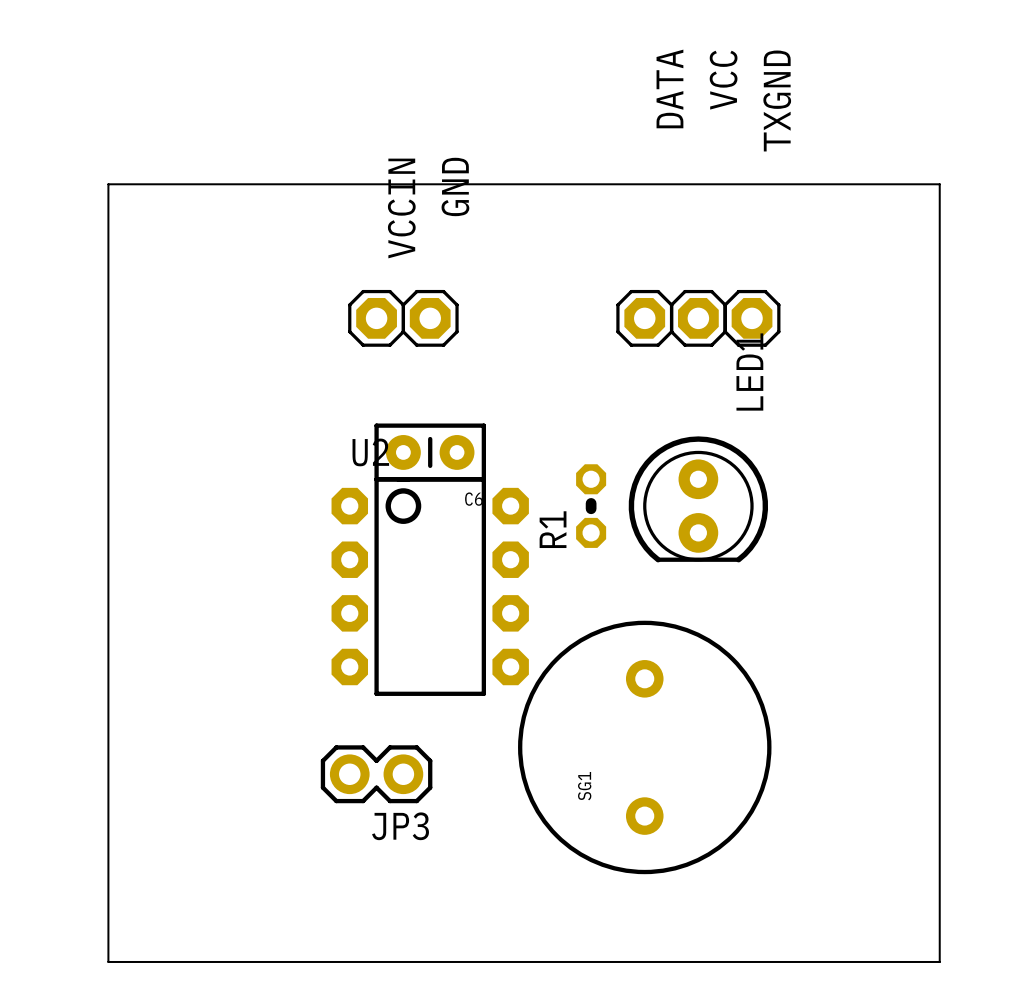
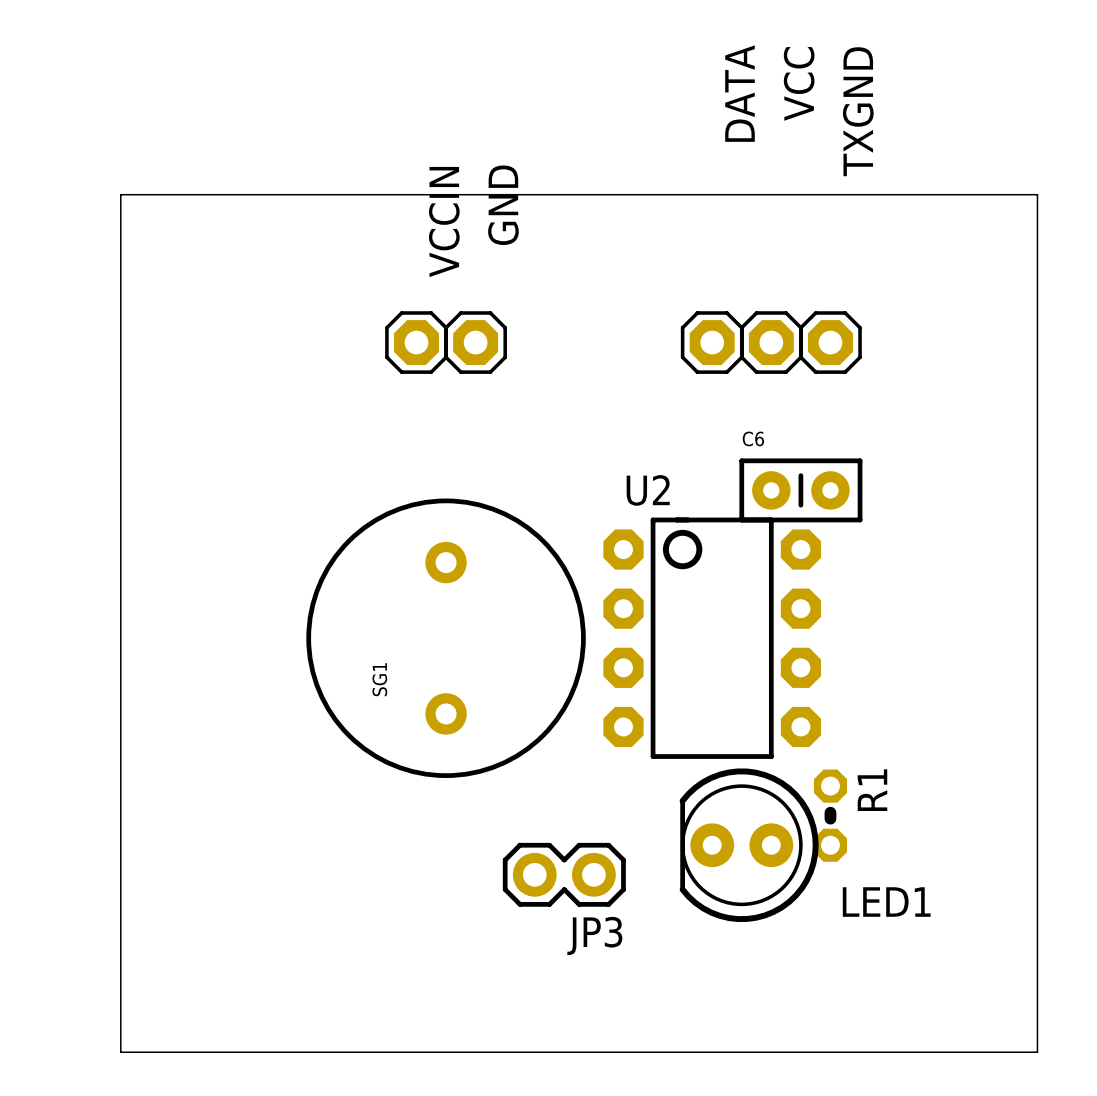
C6 position: (430, 452) -> (800, 490)
C6 name position: C6 (473, 499) -> C6 (753, 438)
LED1 rotation: 0° (698, 499) -> 90° clockwise (749, 845)
LED1 position: (698, 499) -> (749, 845)
R1 position: (591, 506) -> (830, 815)
R1 name position: R1 (553, 529) -> R1 (872, 790)
U2 position: (430, 586) -> (712, 638)
SG1 position: (644, 747) -> (446, 638)
JP3 position: (376, 774) -> (564, 874)

